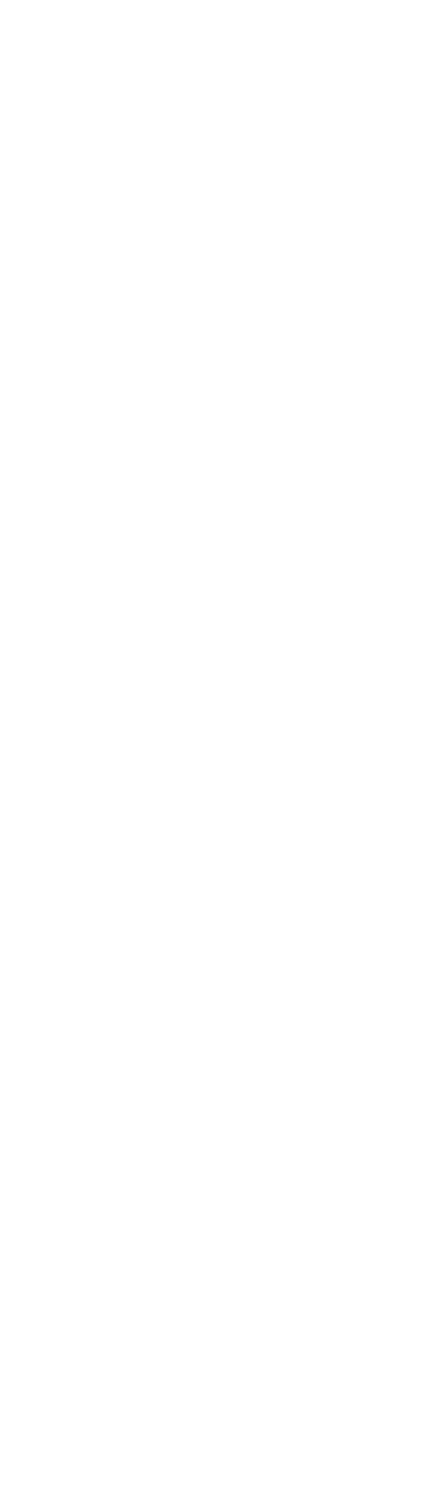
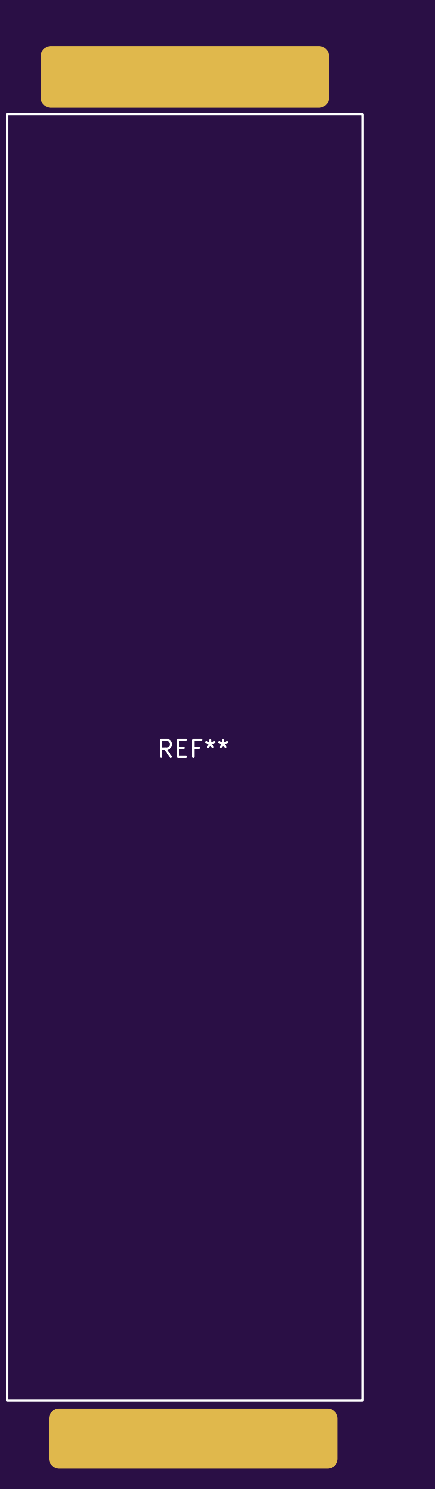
REF**: none -> (184, 757)

